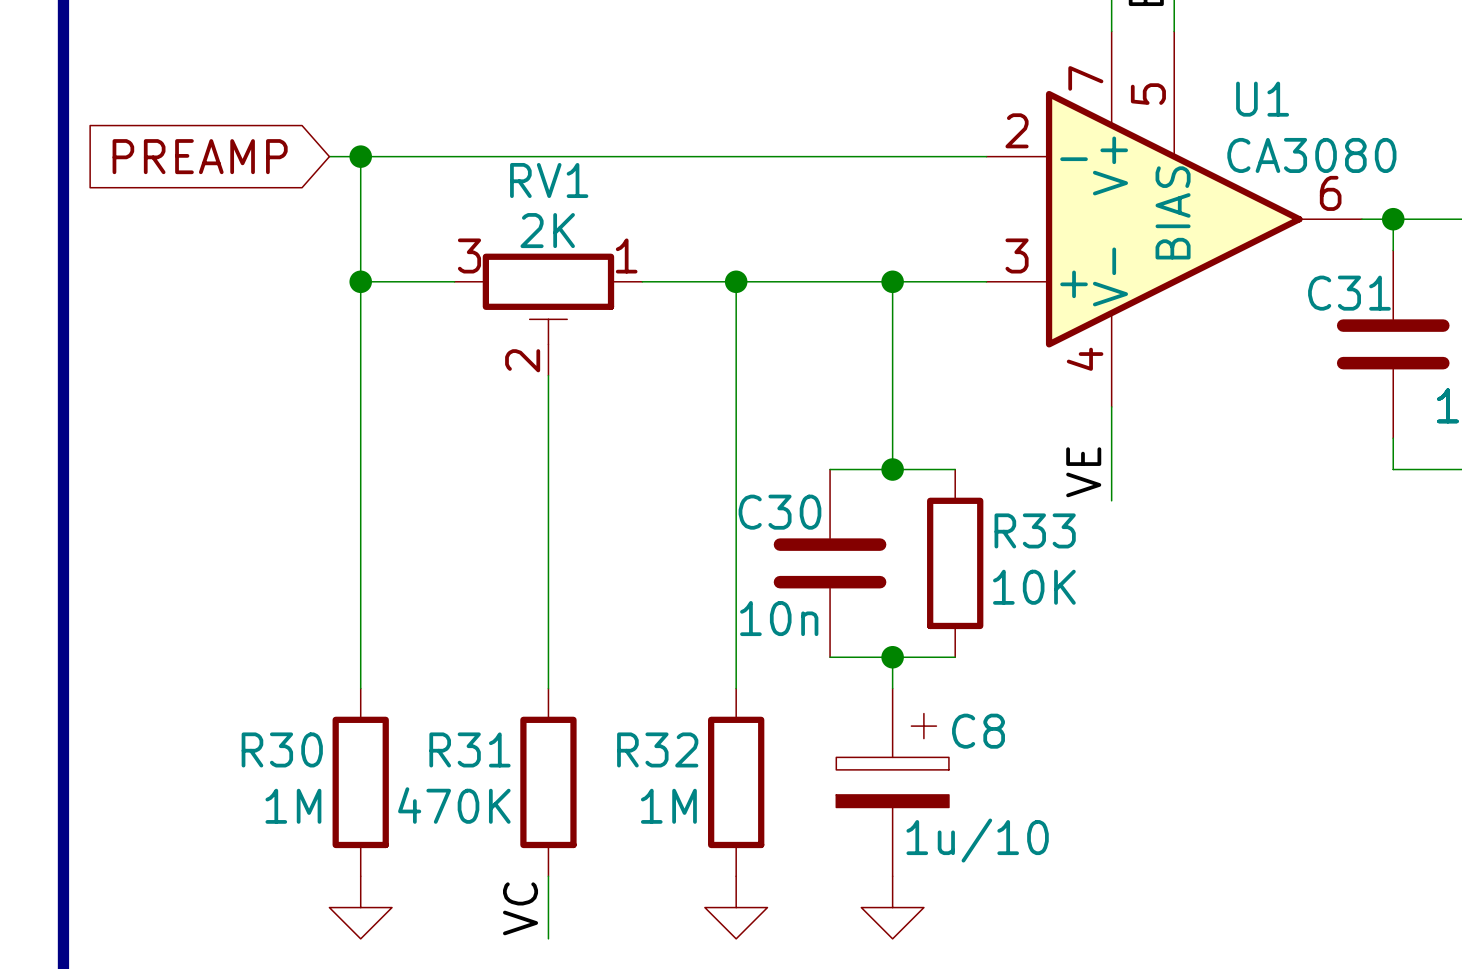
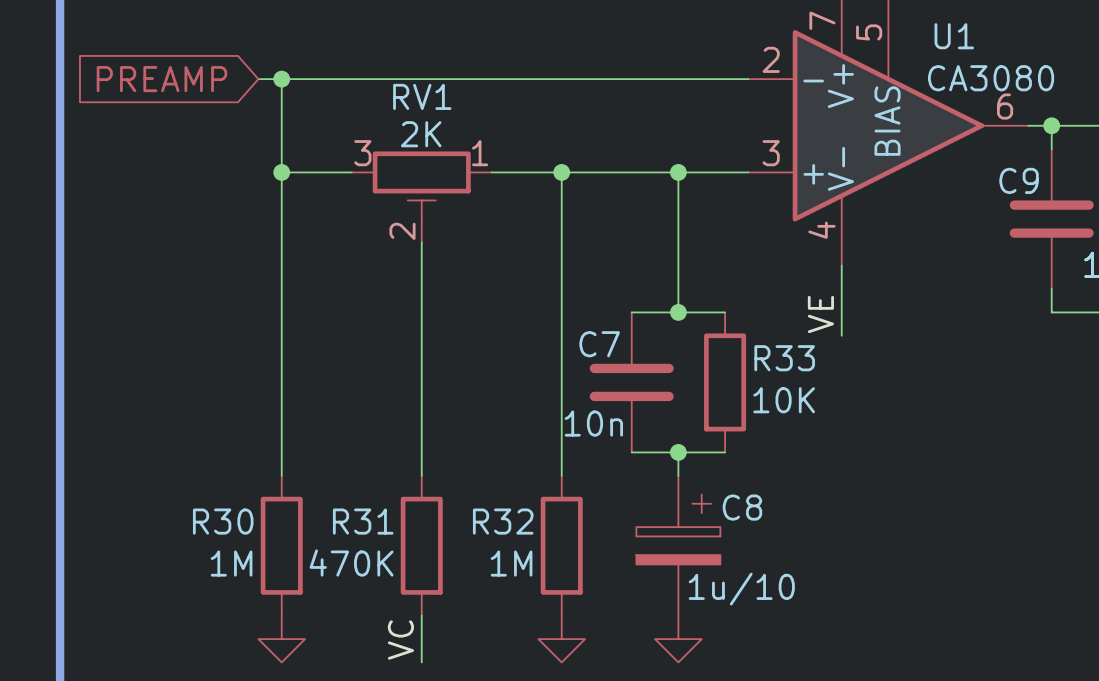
C31 name: C31 (1349, 293) -> C9 (1019, 180)
C30 name: C30 (779, 512) -> C7 (599, 344)

